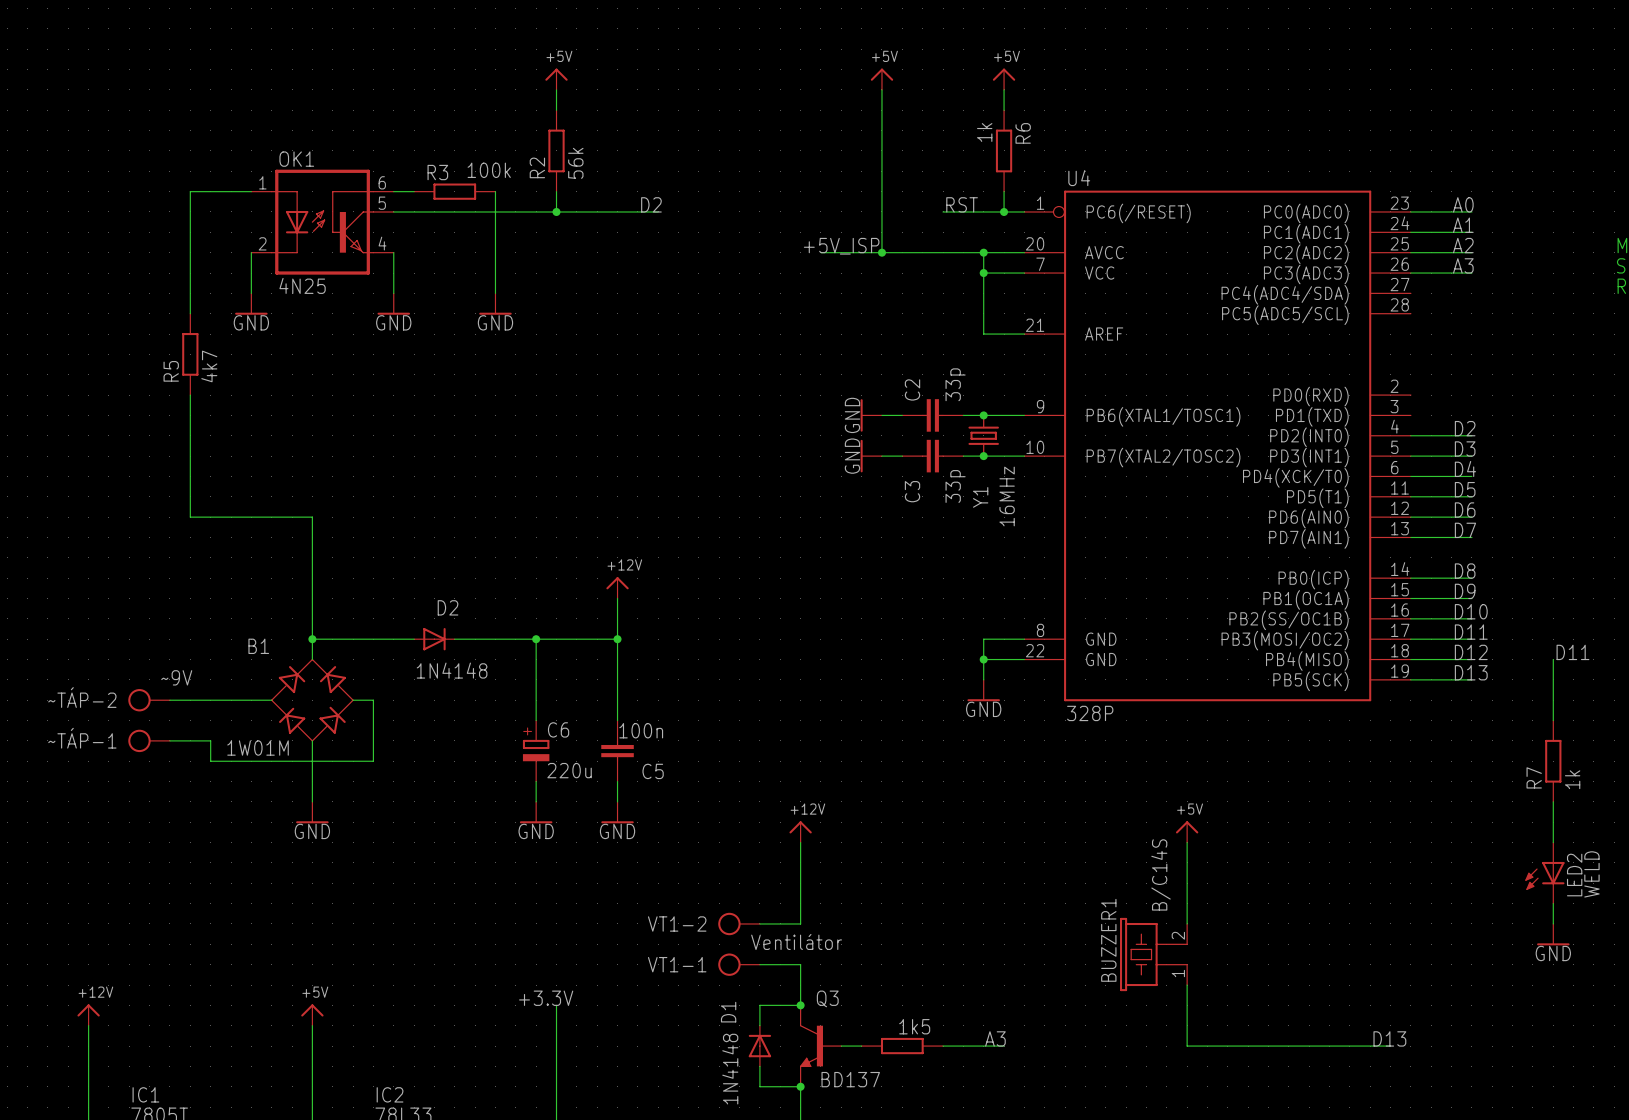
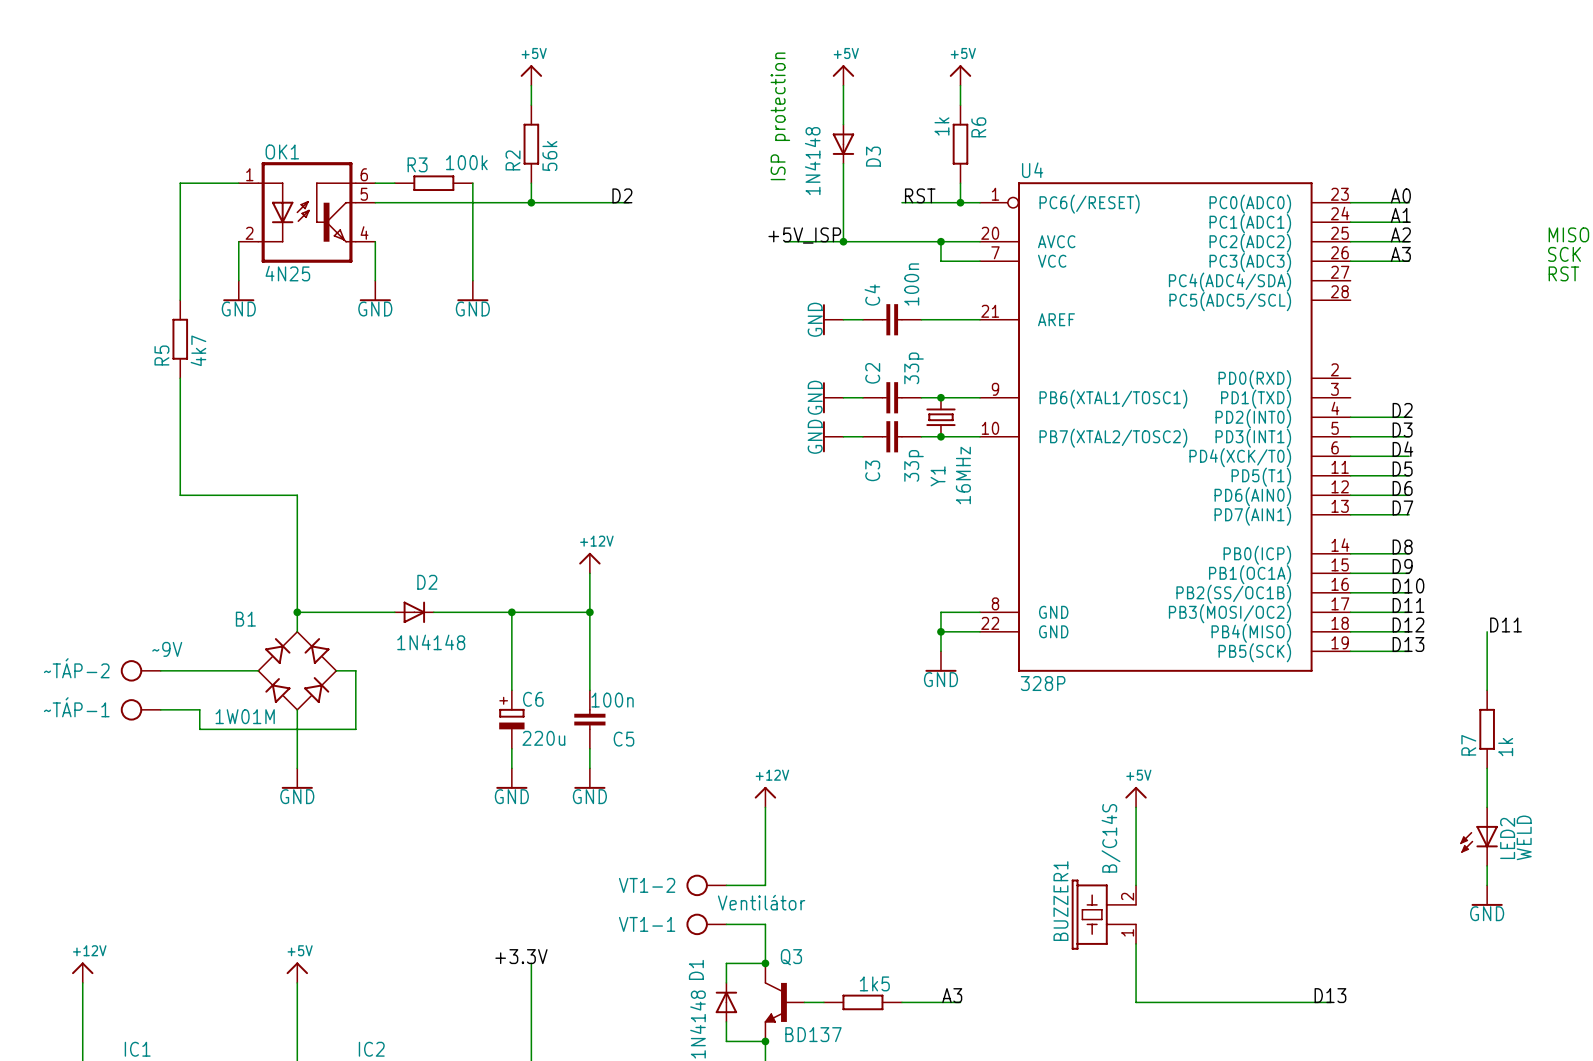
text: none -> ISP protection (780, 116)
D3: none -> 1N4148 (843, 144)
wire: (983, 273) (983, 334) -> (921, 319) (940, 319)
junction: (983, 273) -> none
power symbol: none -> GND (833, 319)
wire: none -> (843, 319) (862, 319)
C4: none -> 100n (892, 319)

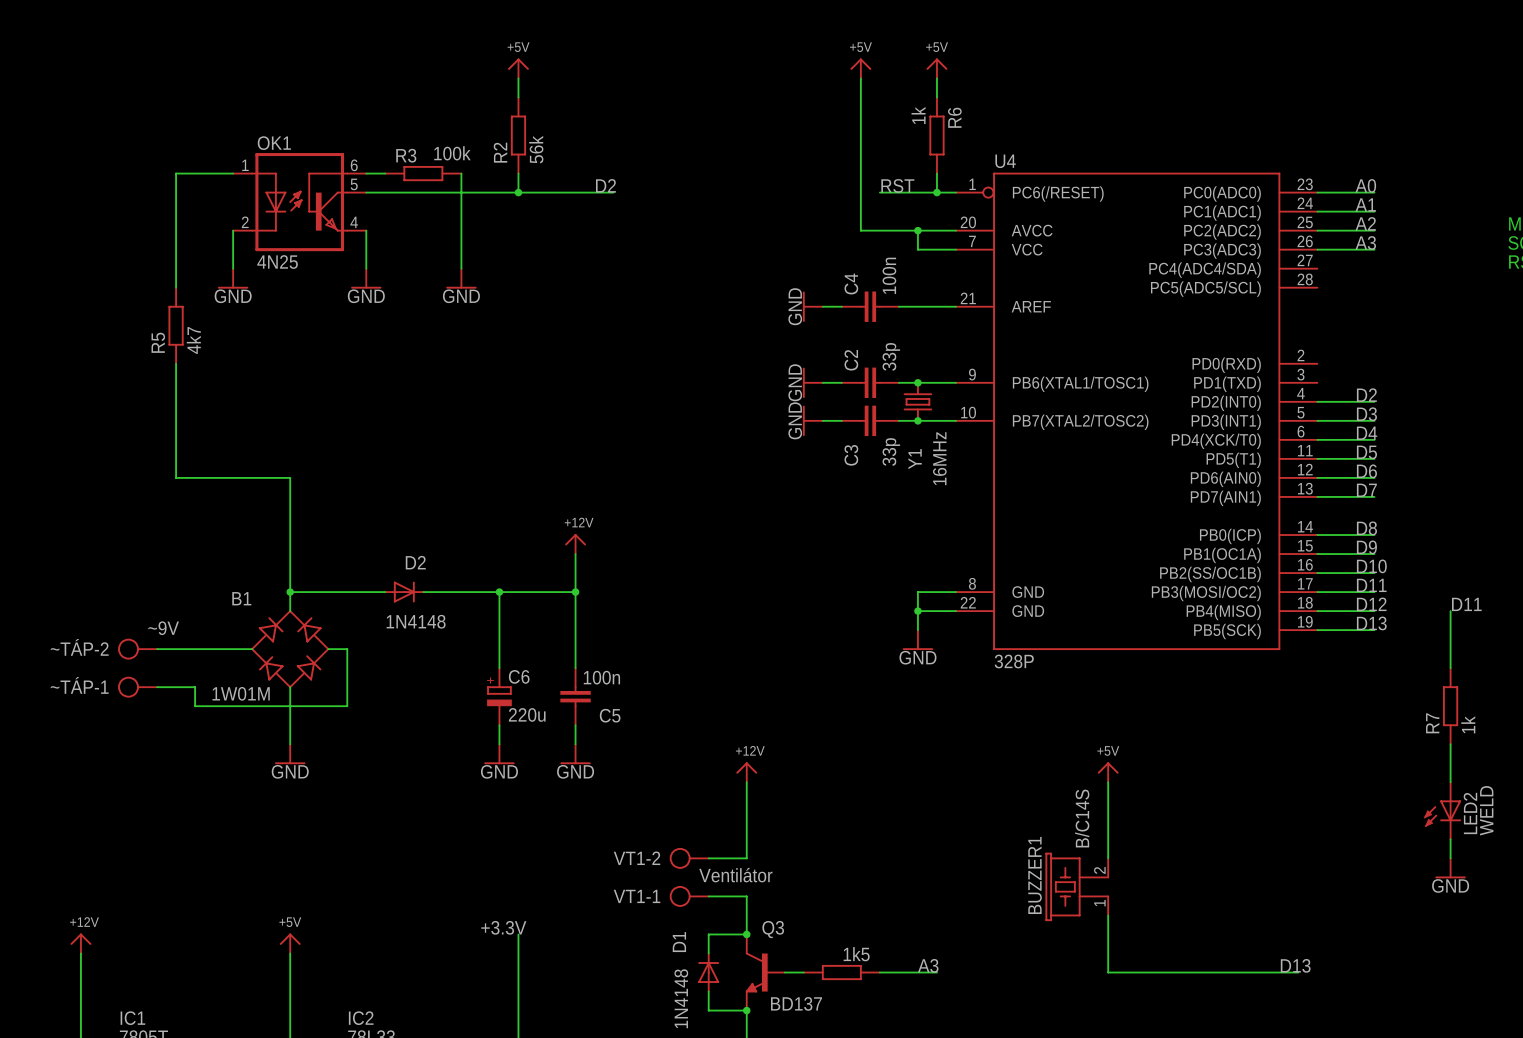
power symbol position: +5V (843, 75) -> +5V (860, 68)
wire: (843, 85) (843, 124) -> none
text: ISP protection (780, 116) -> none
D3: 1N4148 (843, 144) -> none
wire: (843, 163) (843, 241) -> none
label: +5V_ISP (804, 235) -> none
wire: (784, 241) (882, 241) -> (860, 78) (860, 230)
junction: (843, 241) -> none

